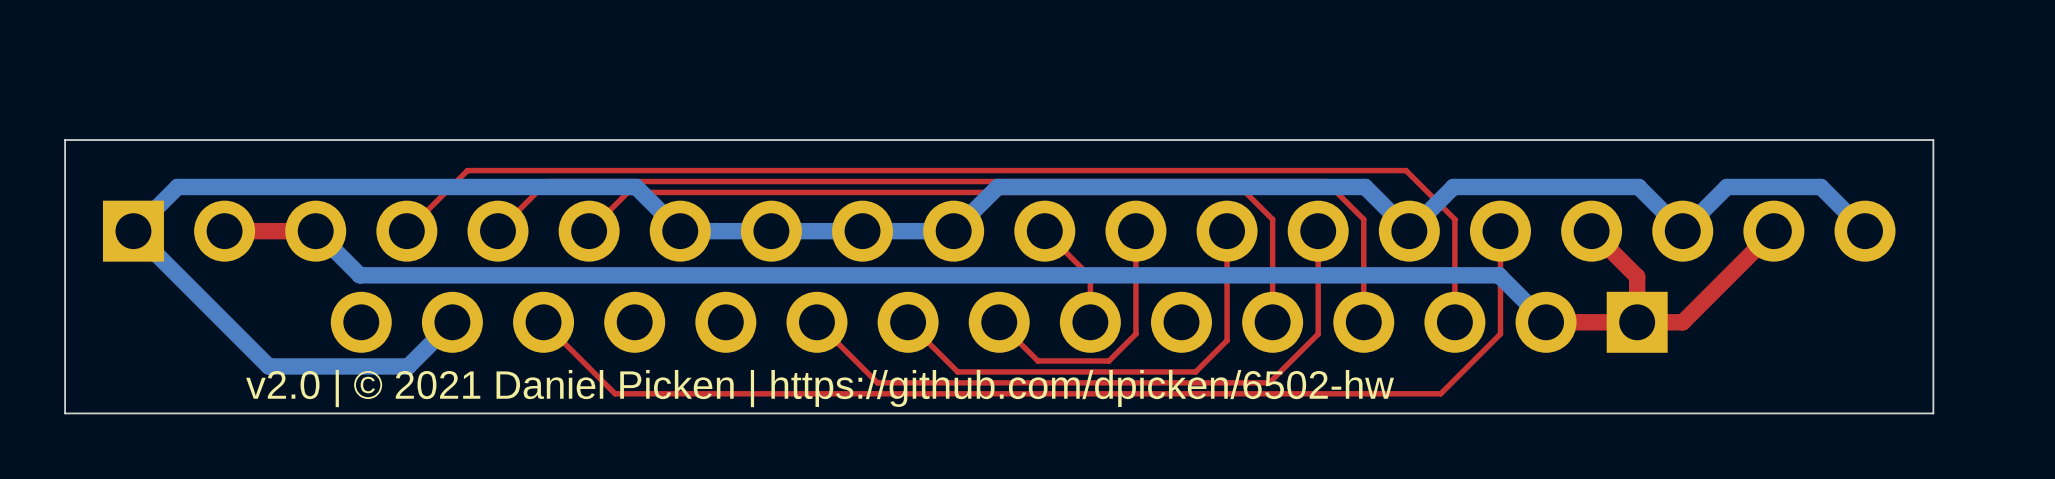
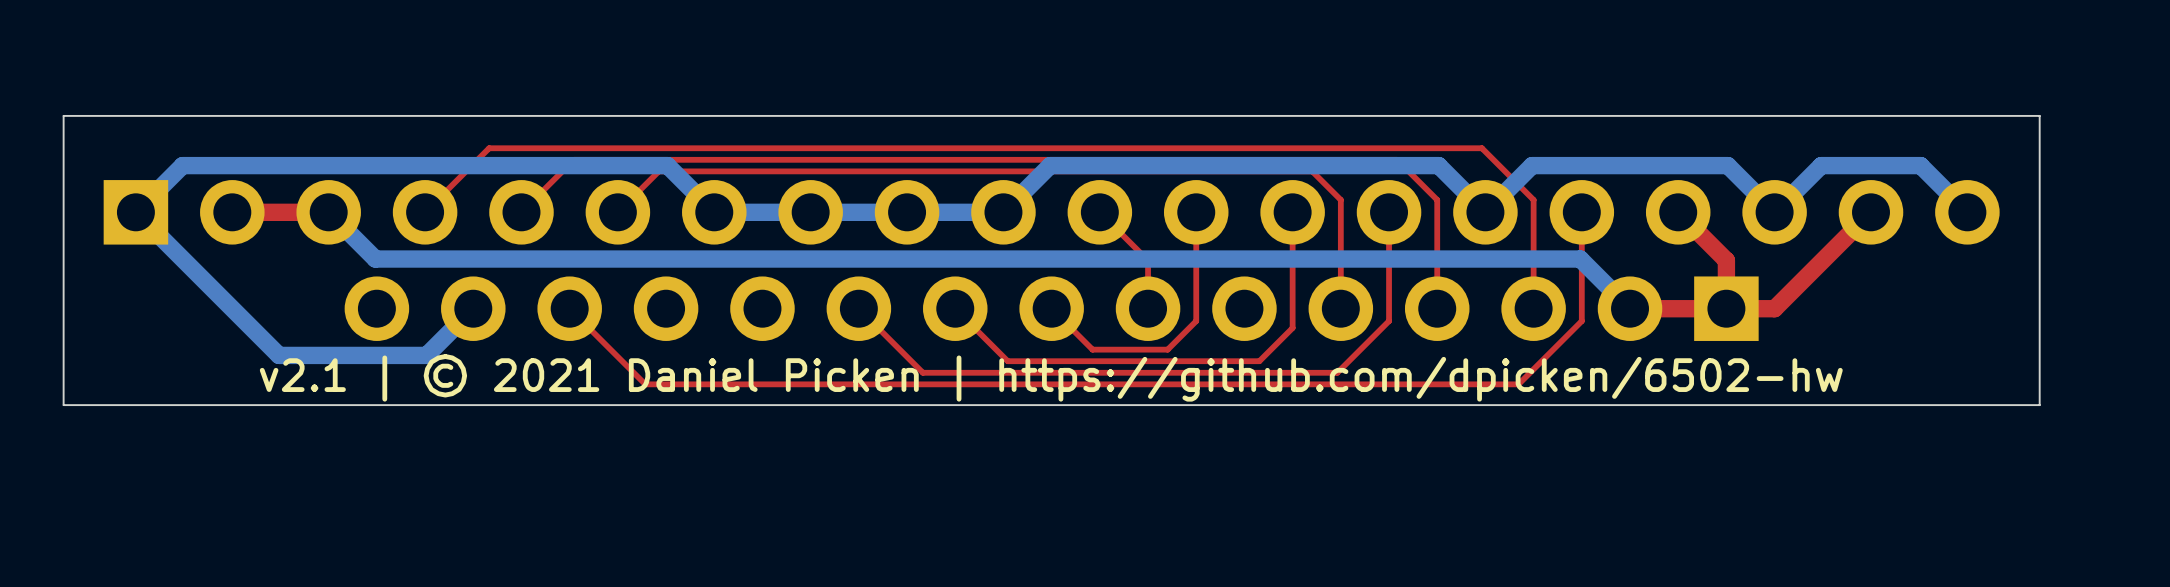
text: v2.0 | © 2021 Daniel Picken | https://github.com/dpicken/6502-hw (820, 388) -> v2.1 | © 2021 Daniel Picken | https://github.com/dpicken/6502-hw (1051, 377)

